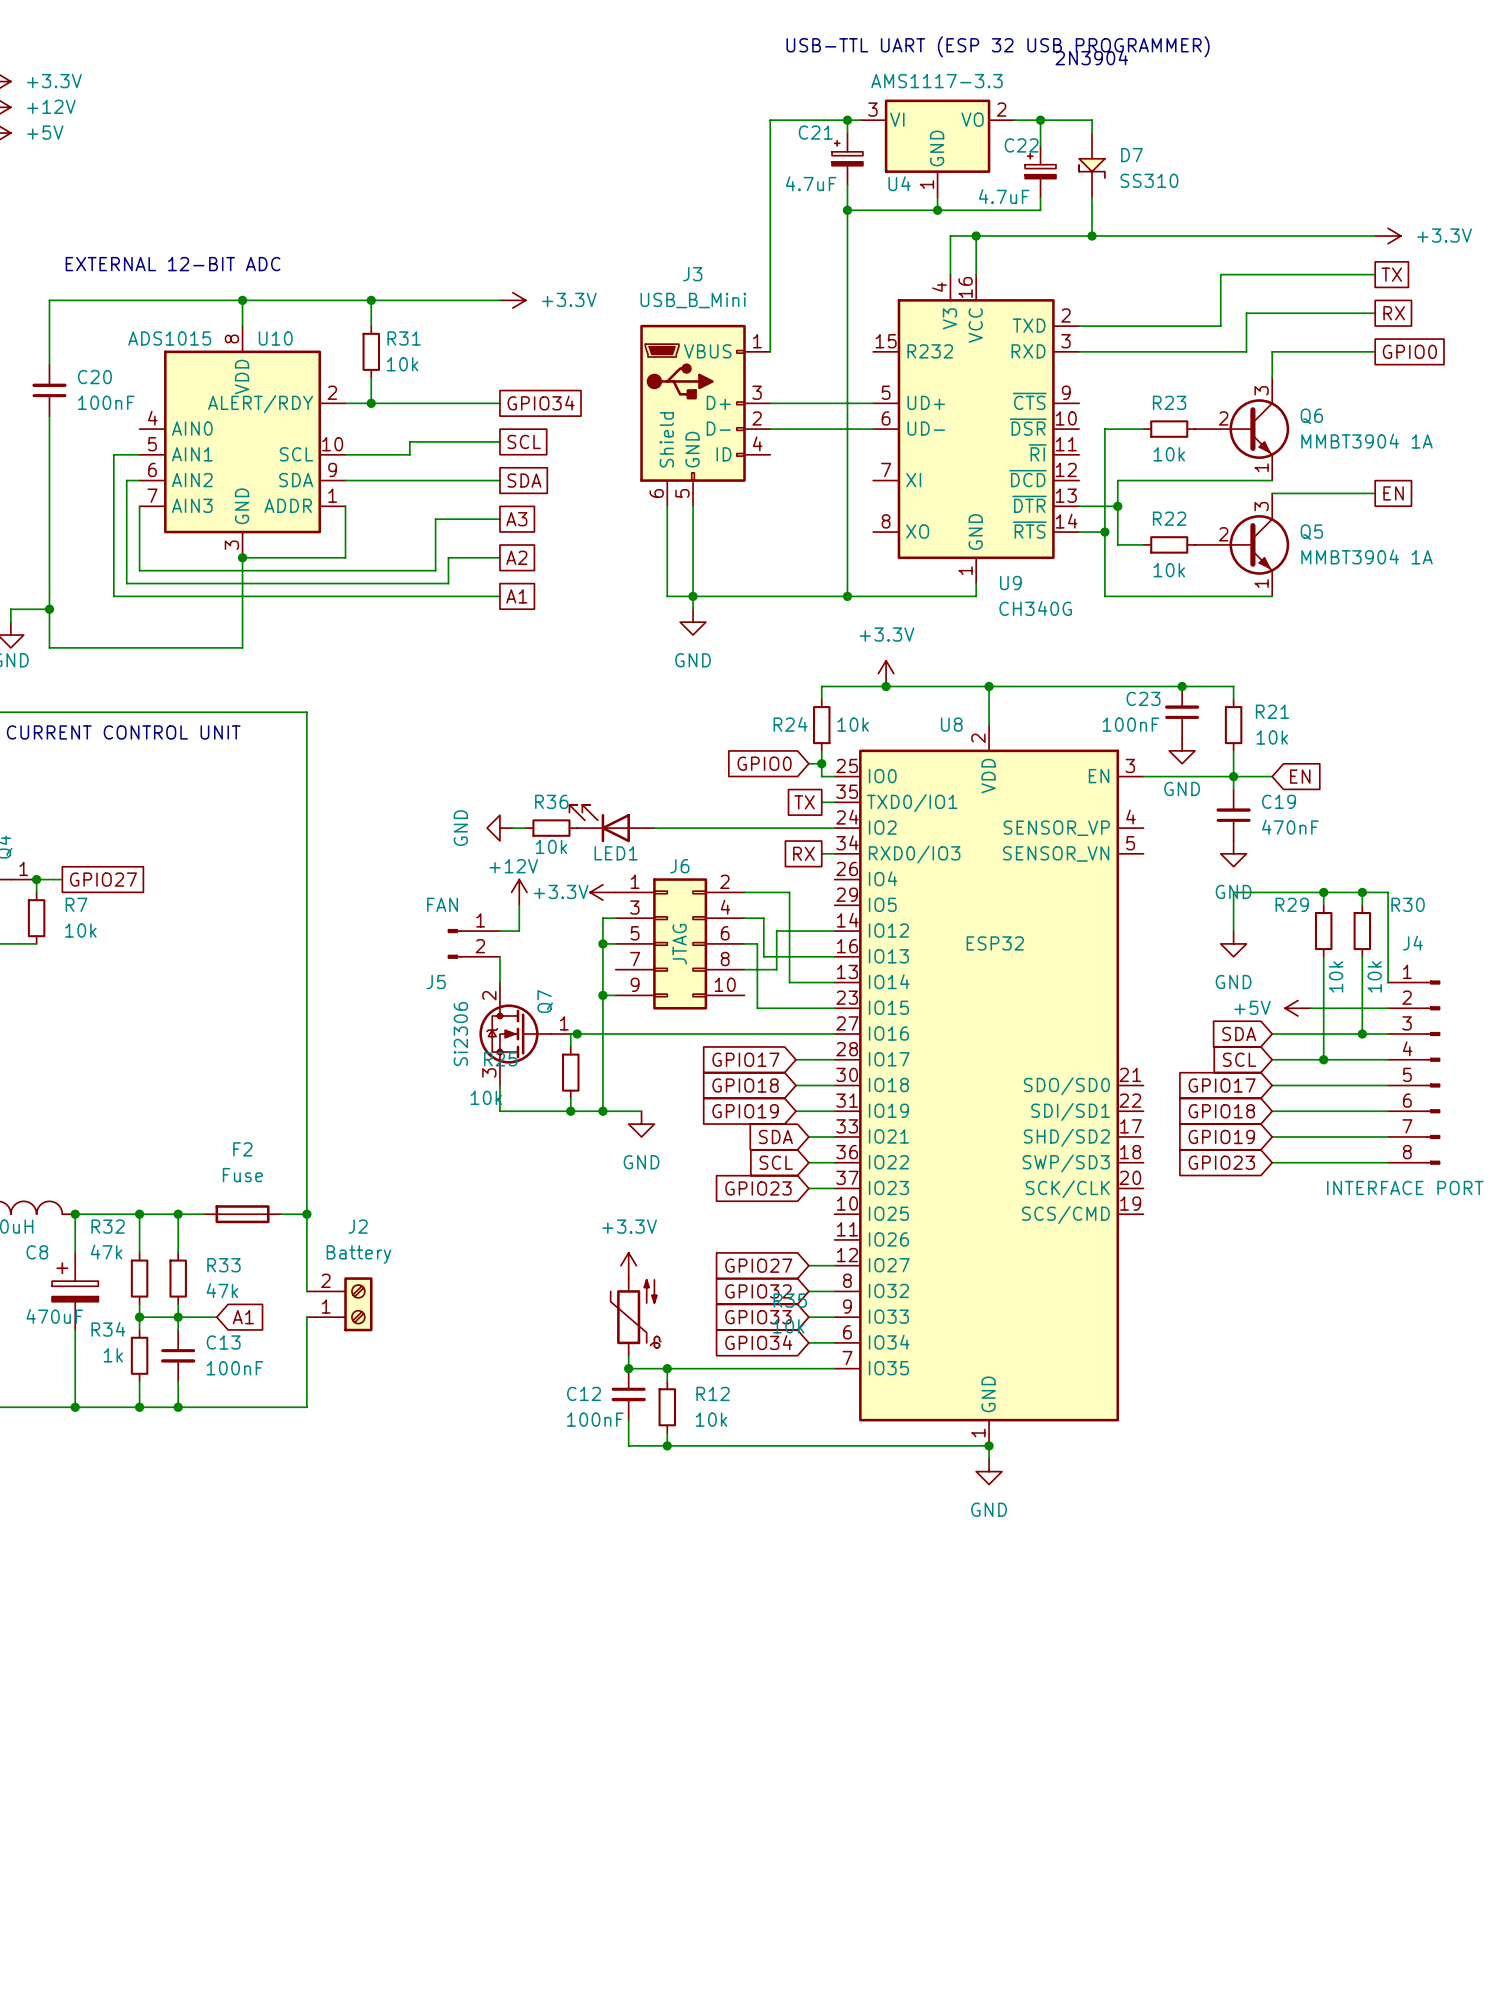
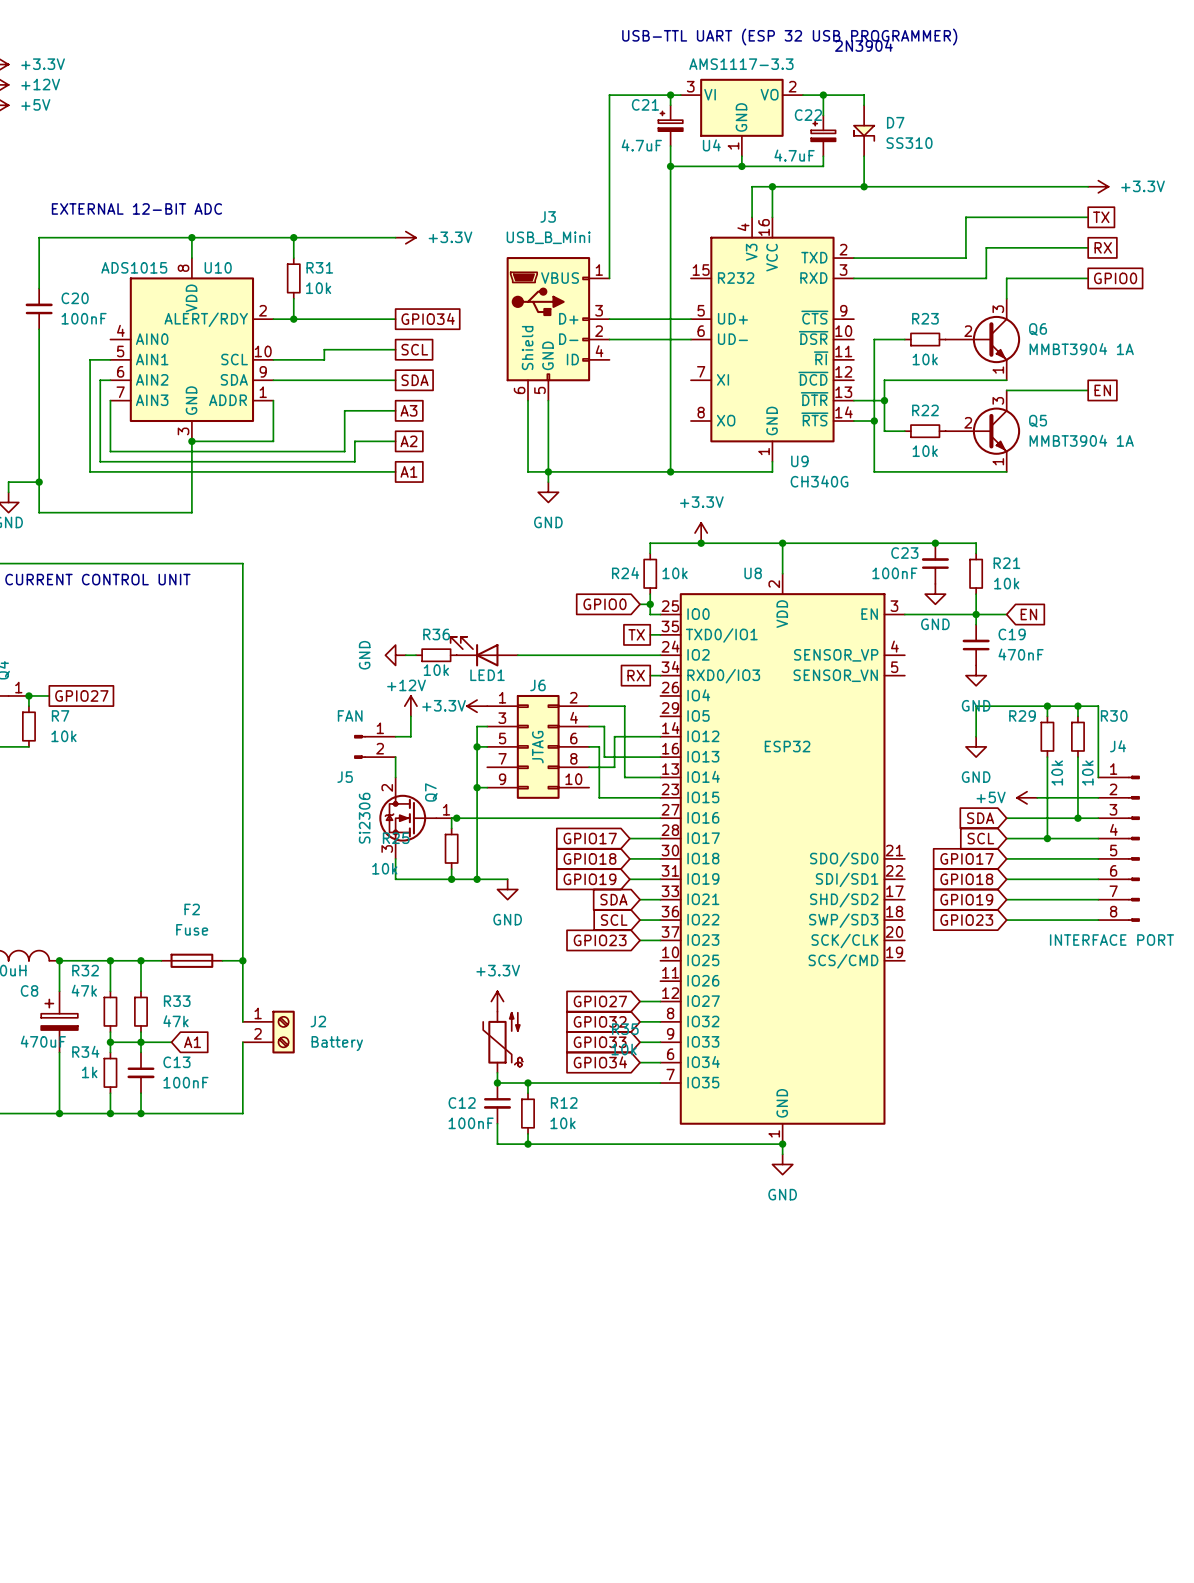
J2 name position: J2 (358, 1226) -> J2 (318, 1021)
J2 value position: Battery (358, 1254) -> Battery (337, 1043)
J2 flip: as is (358, 1304) -> up-down (283, 1032)

